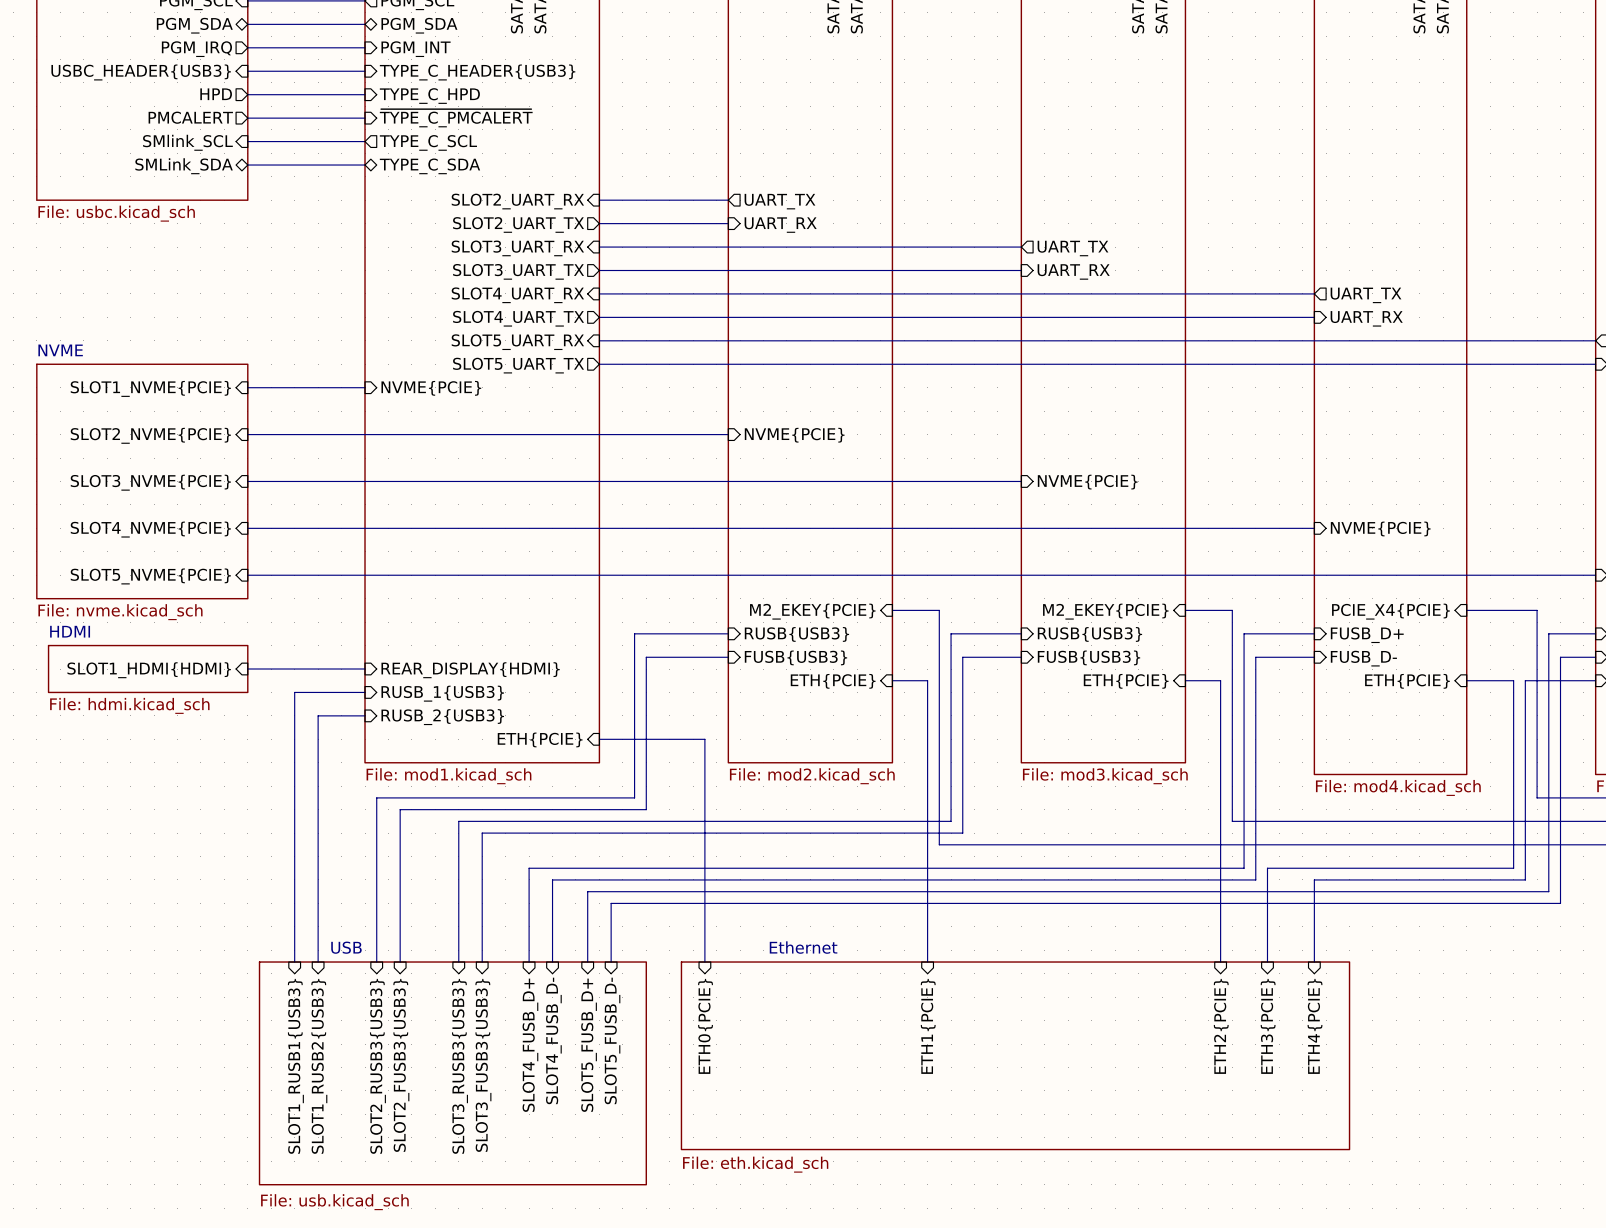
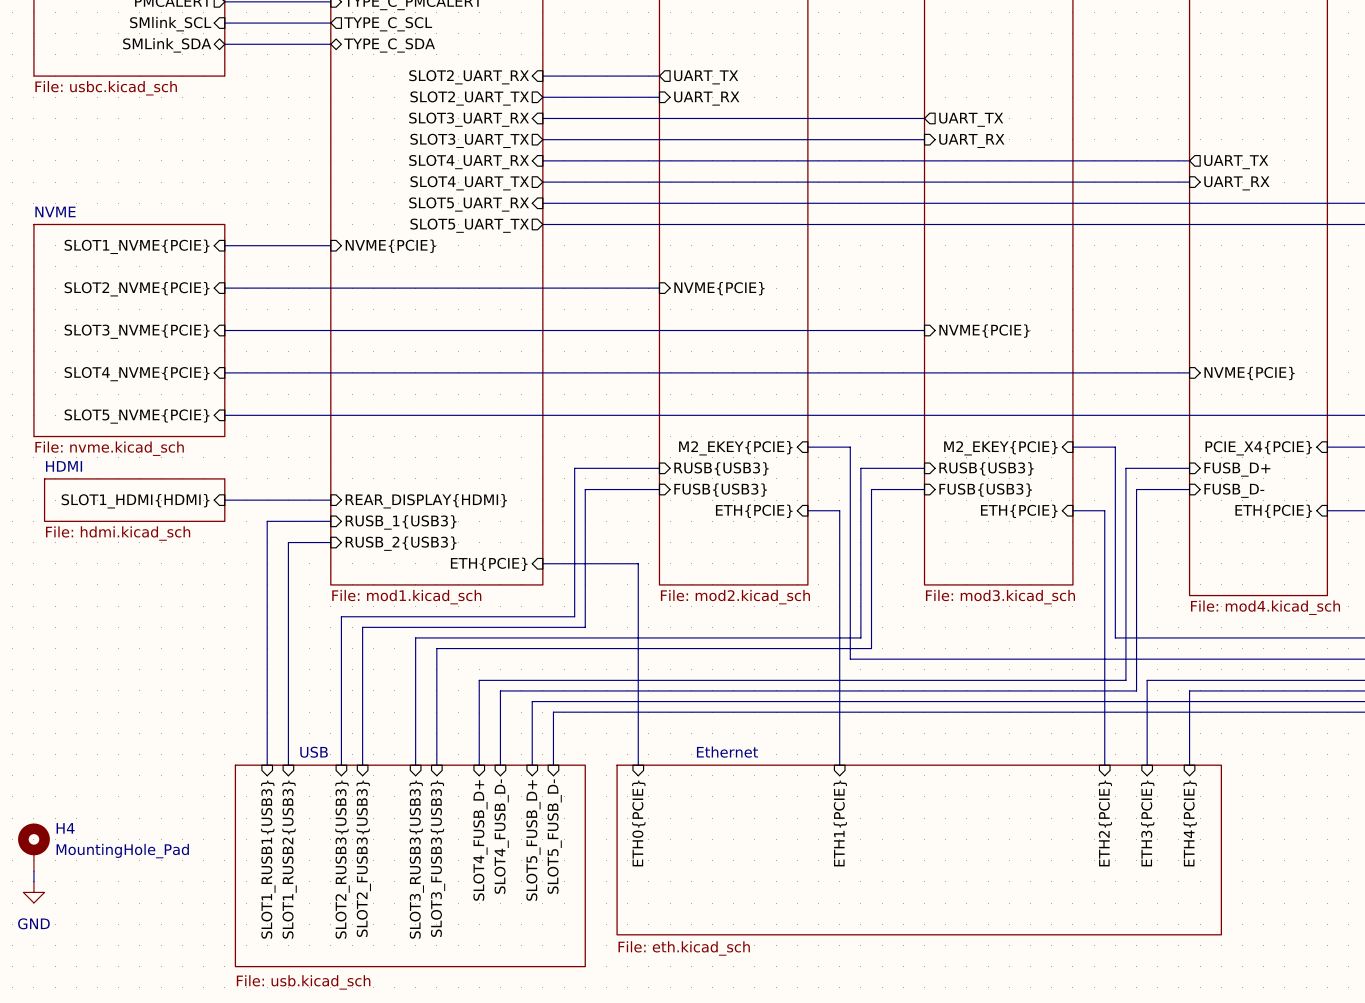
H4: none -> MountingHole_Pad (33, 847)
wire: none -> (33, 871) (33, 881)
power symbol: none -> GND (33, 892)

